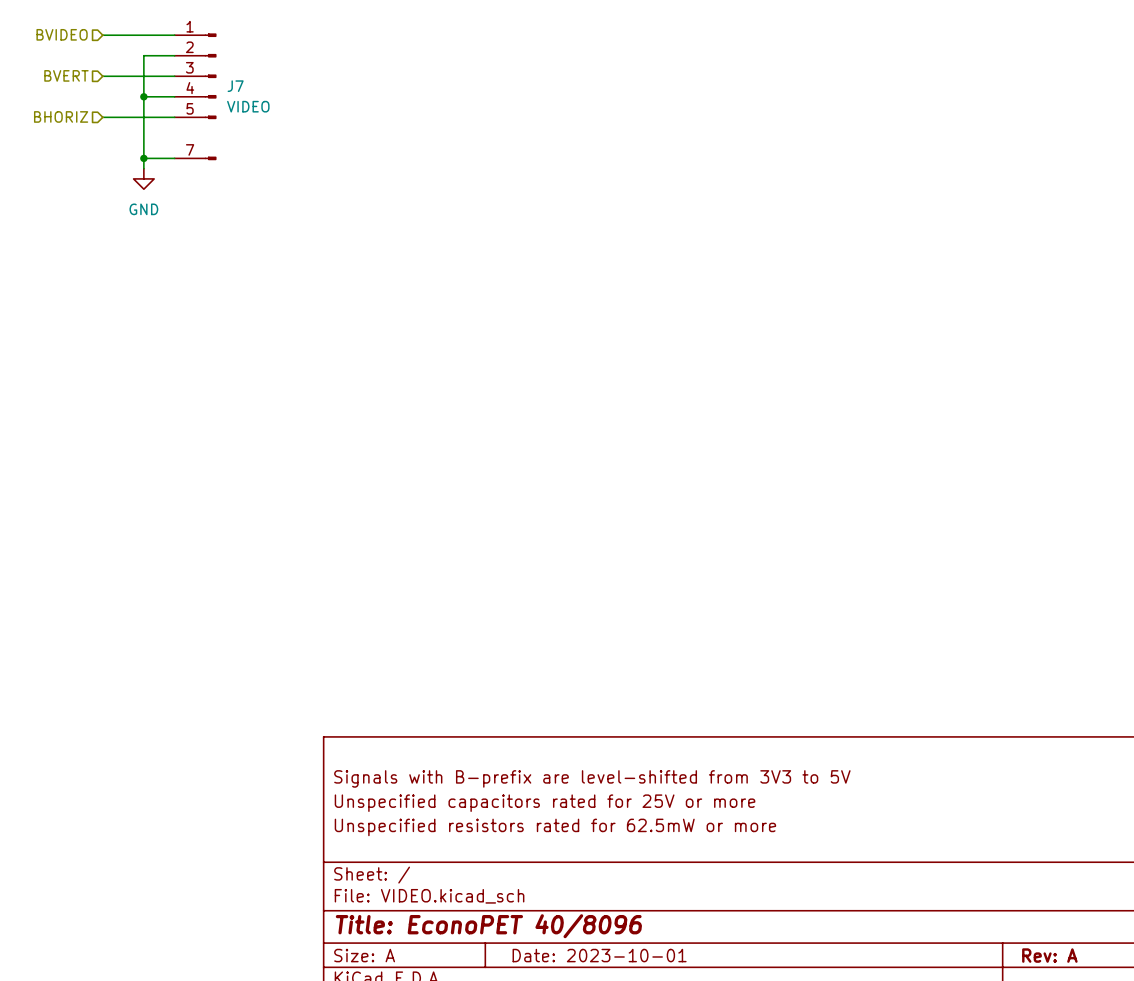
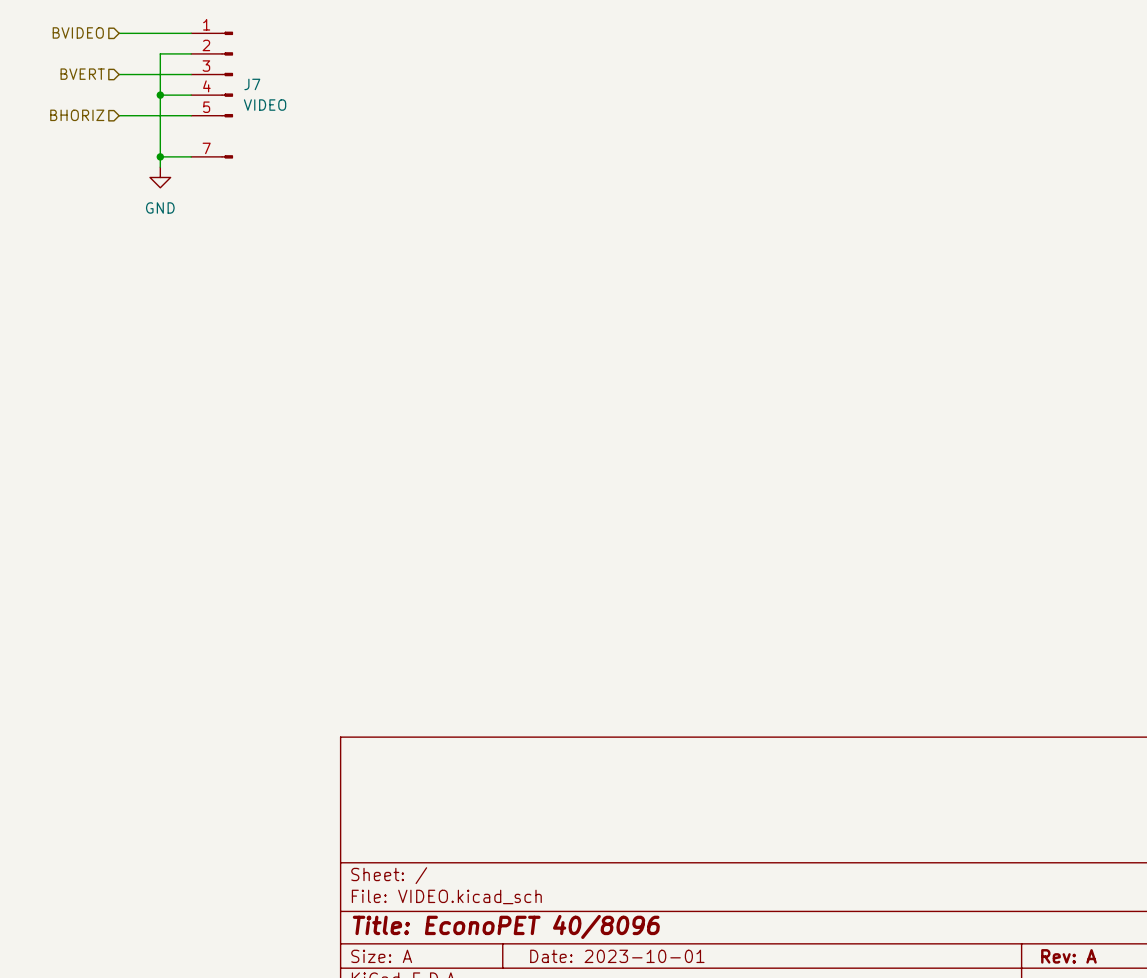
title block: Signals with B-prefix are level-shifted from 3V3 to 5V (592, 778) -> none
title block: Unspecified capacitors rated for 25V or more (545, 803) -> none
title block: Unspecified resistors rated for 62.5mW or more (555, 827) -> none

